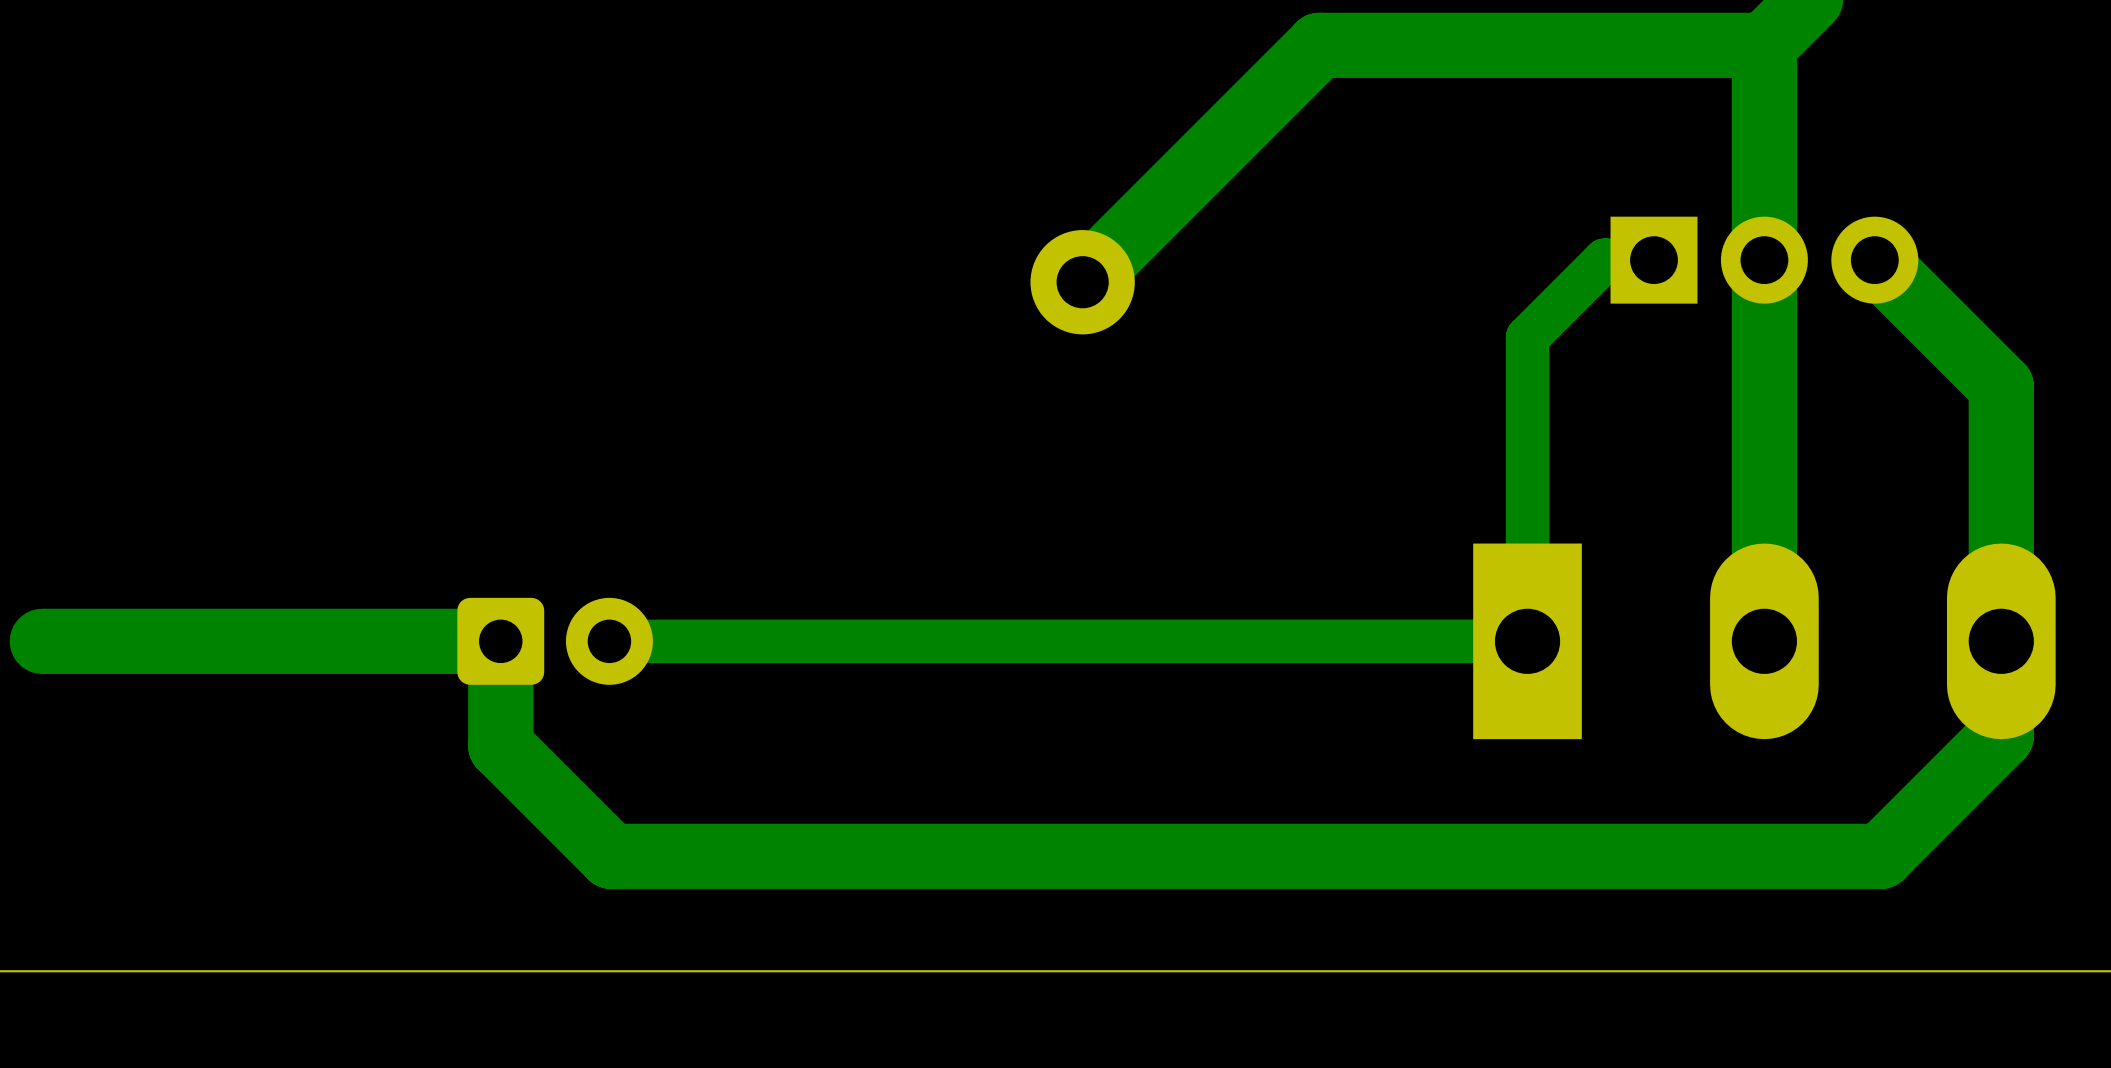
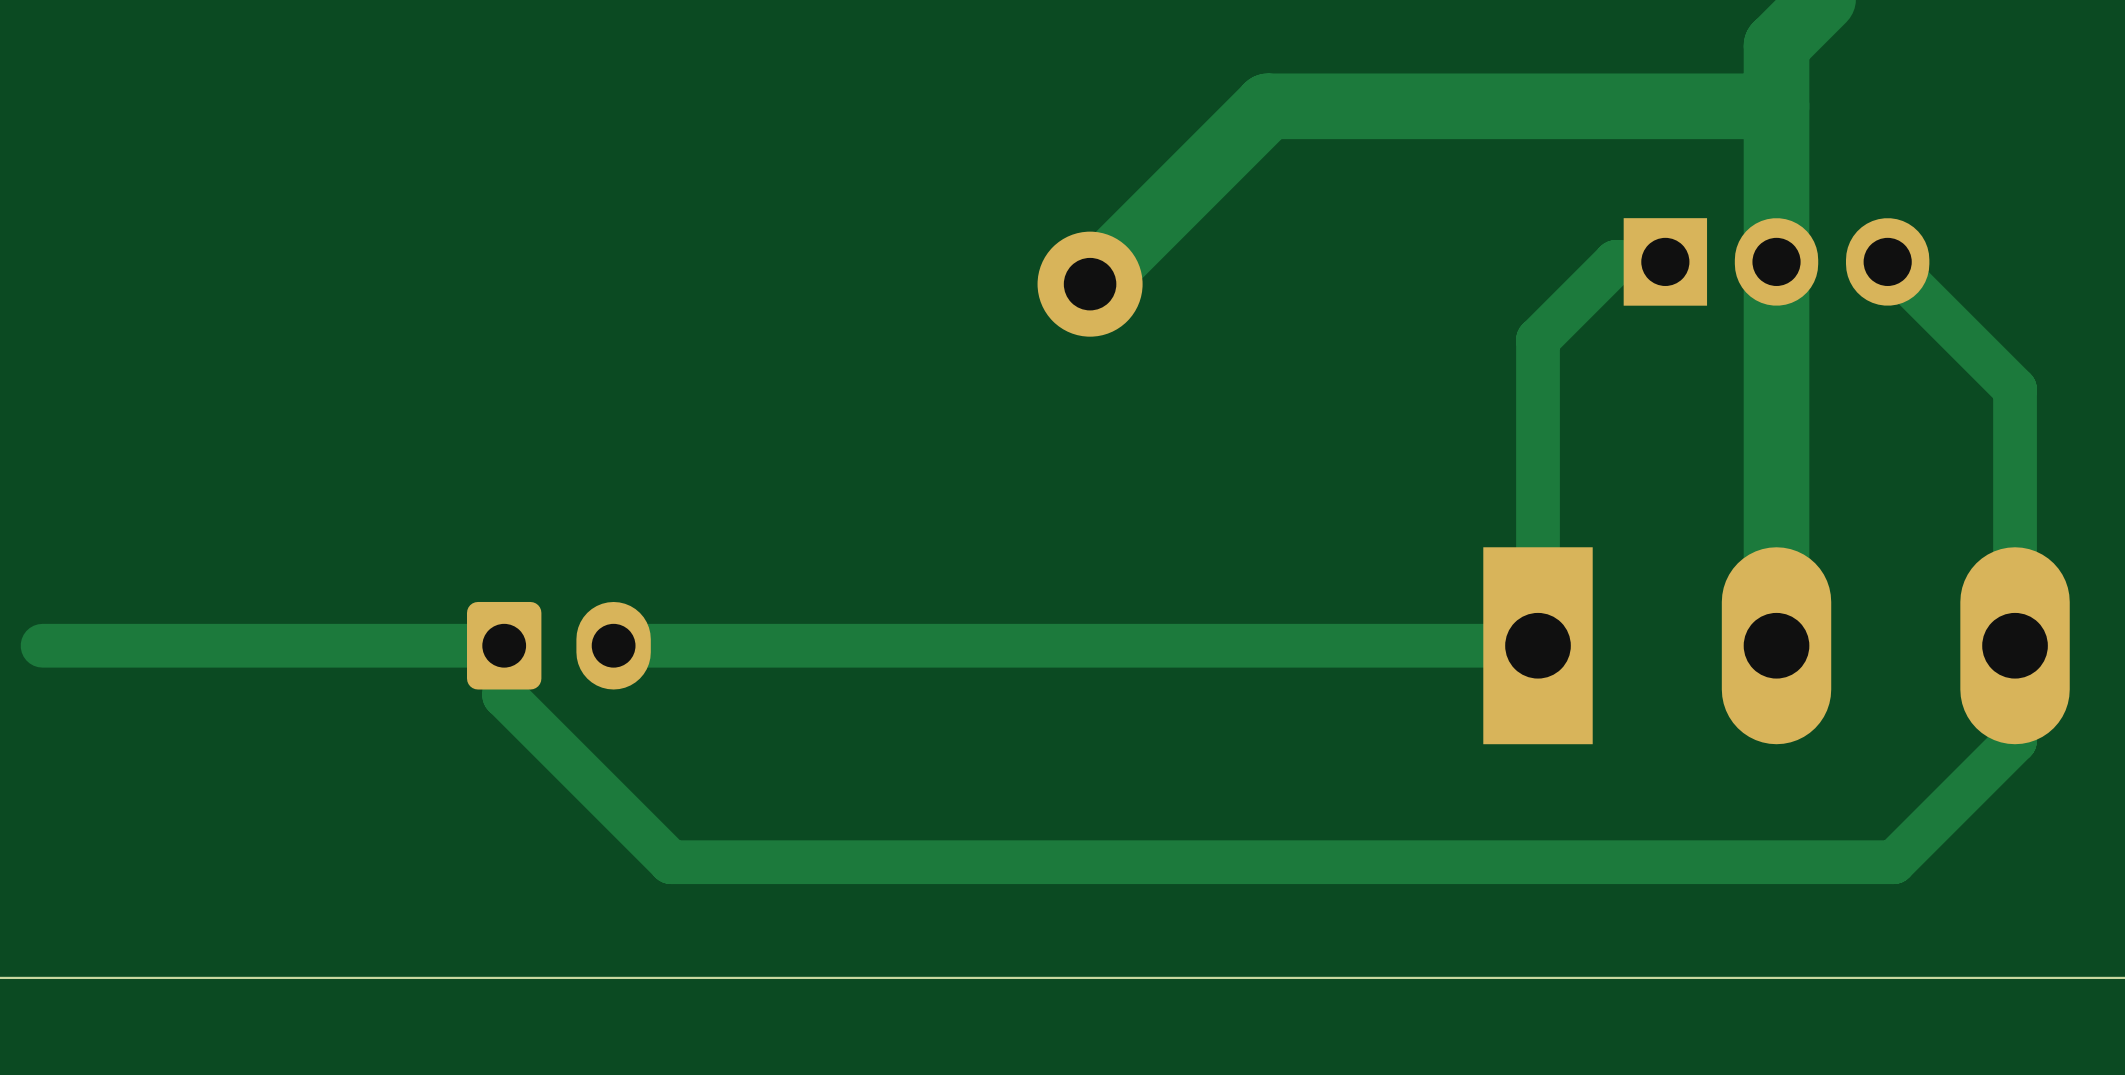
track: (1764, 45) (1319, 45) (1259, 105) -> (1776, 106) (1267, 106)
part footprint: [1610, 216, 1919, 304] -> [1623, 218, 1930, 306]
track width: thick (1874, 260) (2001, 386) (2001, 735) (1880, 856) (666, 856) -> thin (1887, 261) (2015, 389) (2015, 740) (1893, 862) (670, 862)
part footprint: [457, 597, 653, 685] -> [467, 601, 651, 690]
track width: thick (42, 641) (500, 641) (500, 690) -> thin (42, 645) (504, 645) (504, 695)
track: (500, 690) (500, 745) (611, 856) (666, 856) -> (504, 695) (670, 862)

